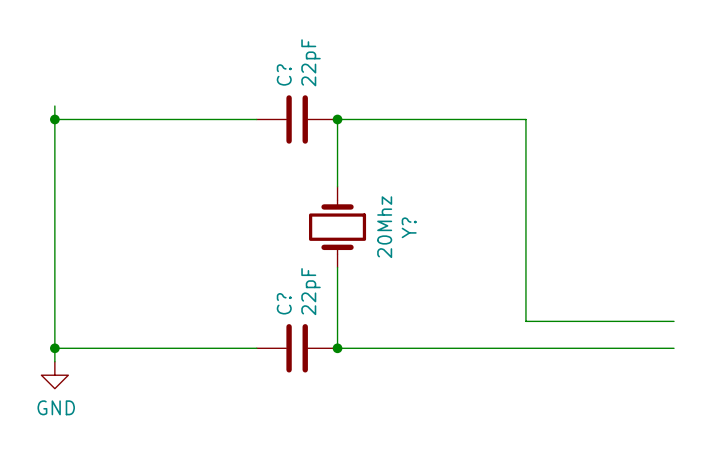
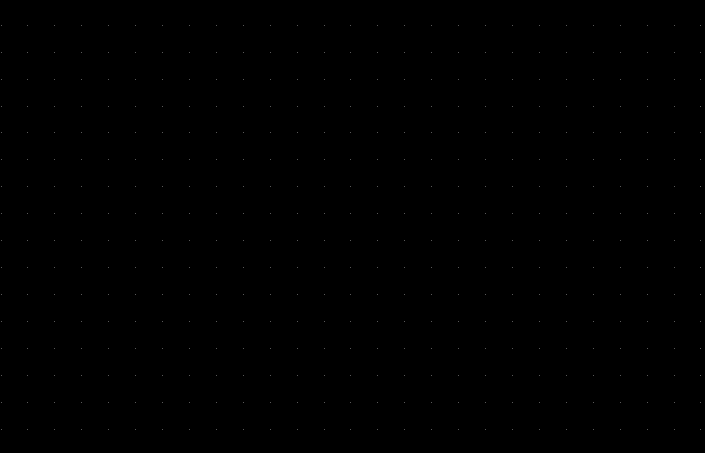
wire: (54, 106) (54, 361) -> none
wire: (54, 119) (256, 119) -> none
junction: (54, 119) -> none
C?: 22pF (297, 119) -> none
junction: (337, 119) -> none
wire: (337, 186) (337, 119) (525, 119) (525, 321) (674, 321) -> none
Y?: 20Mhz (337, 227) -> none
wire: (337, 267) (337, 348) (674, 348) -> none
wire: (54, 348) (256, 348) -> none
junction: (54, 348) -> none
C?: 22pF (297, 348) -> none
junction: (337, 348) -> none
power symbol: GND (54, 375) -> none

